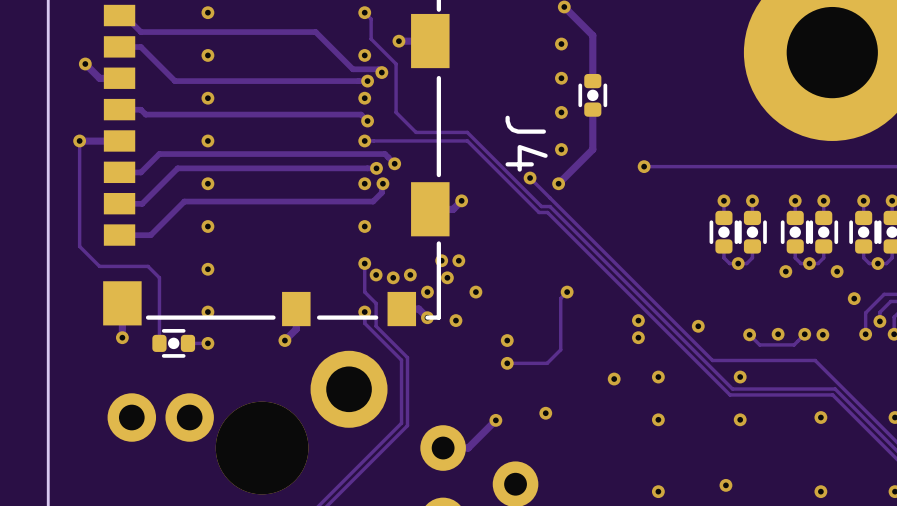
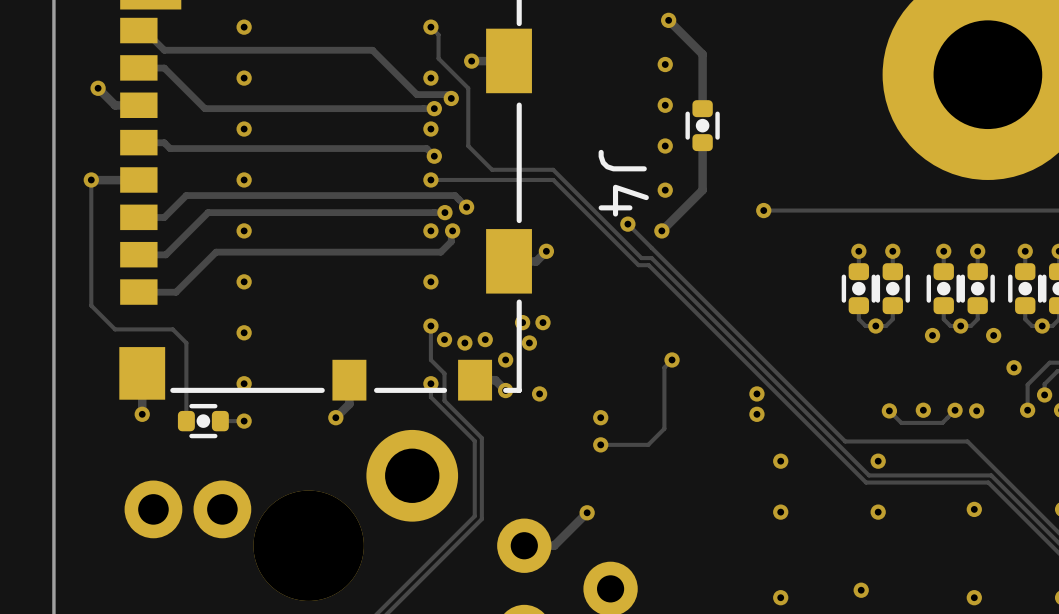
via: (475, 292) -> none
via: (698, 326) -> none
via: (614, 379) -> none
via: (545, 413) -> none

